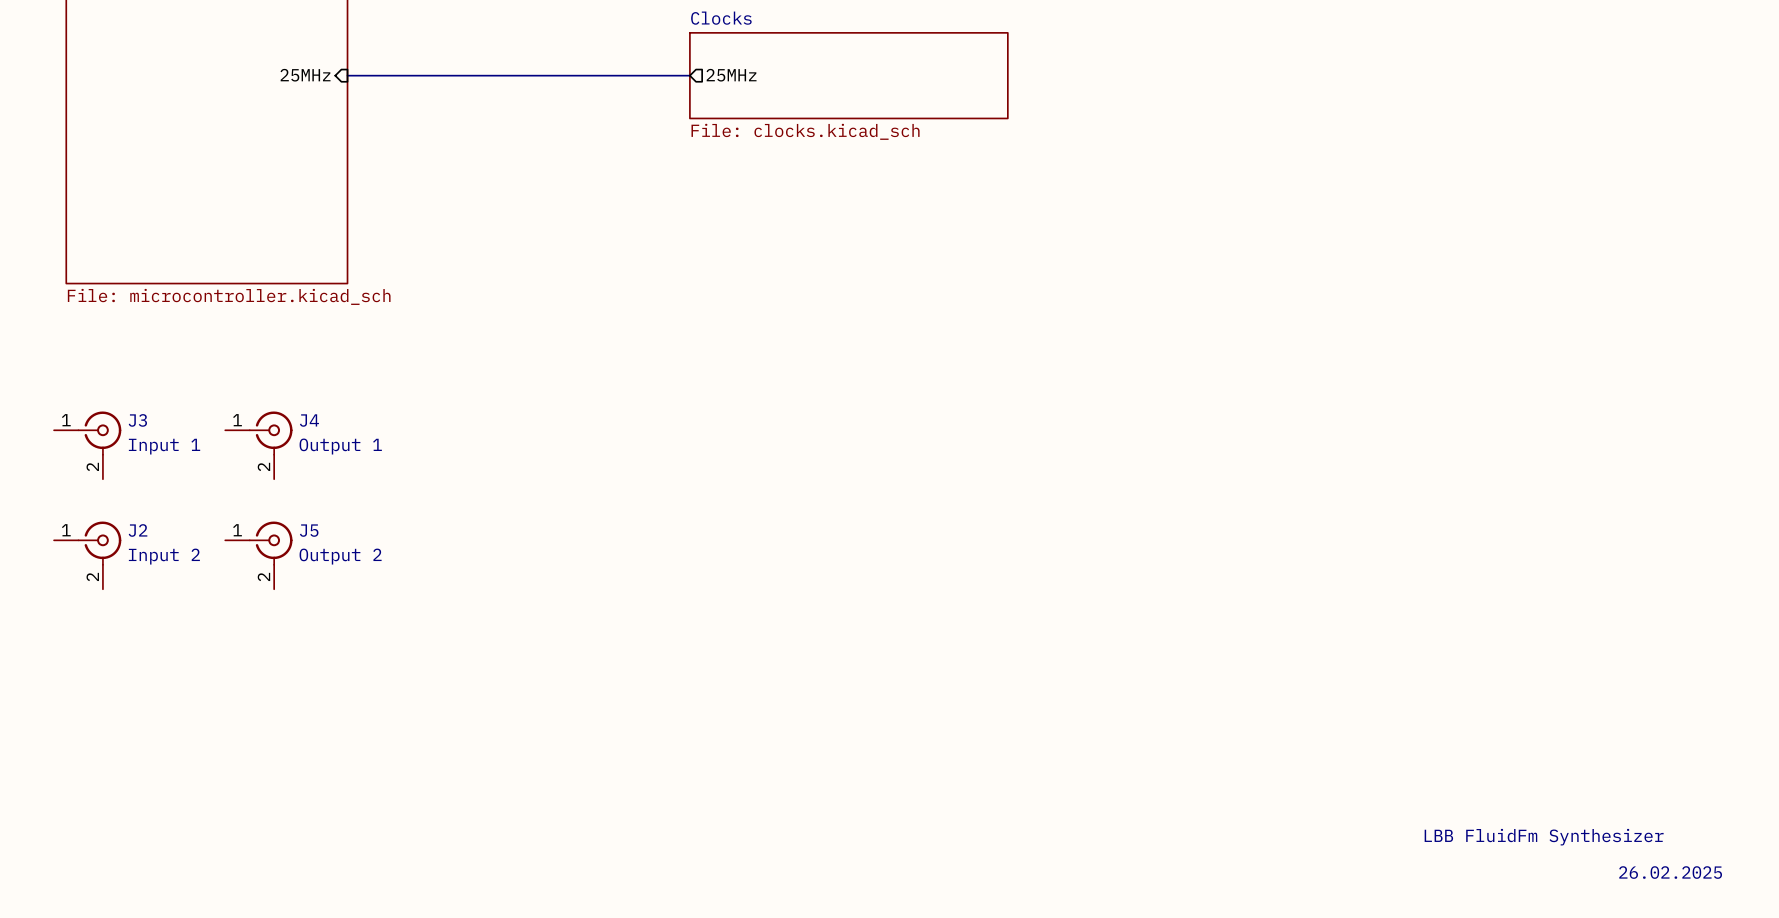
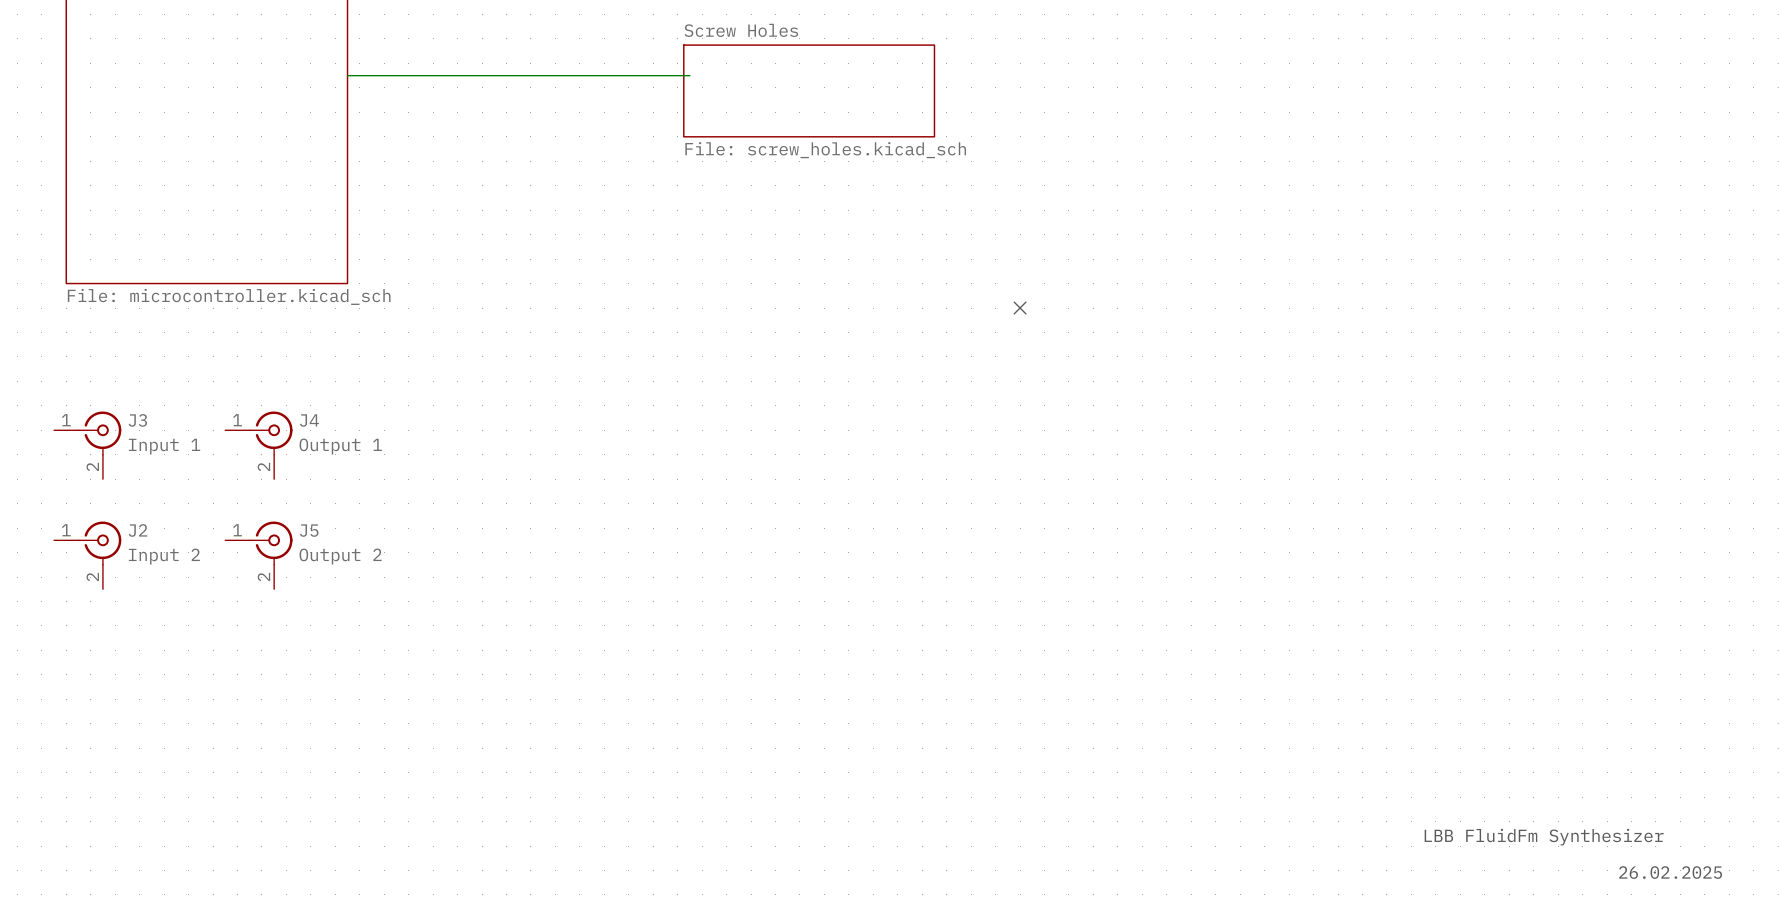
sheet pin: 25MHz (305, 75) -> none
sheet pin: 25MHz (731, 75) -> none
sheet Clocks: File: clocks.kicad_sch (848, 75) -> none
sheet Screw Holes: none -> File: screw_holes.kicad_sch (809, 90)
no-connect mark: none -> (1020, 308)

